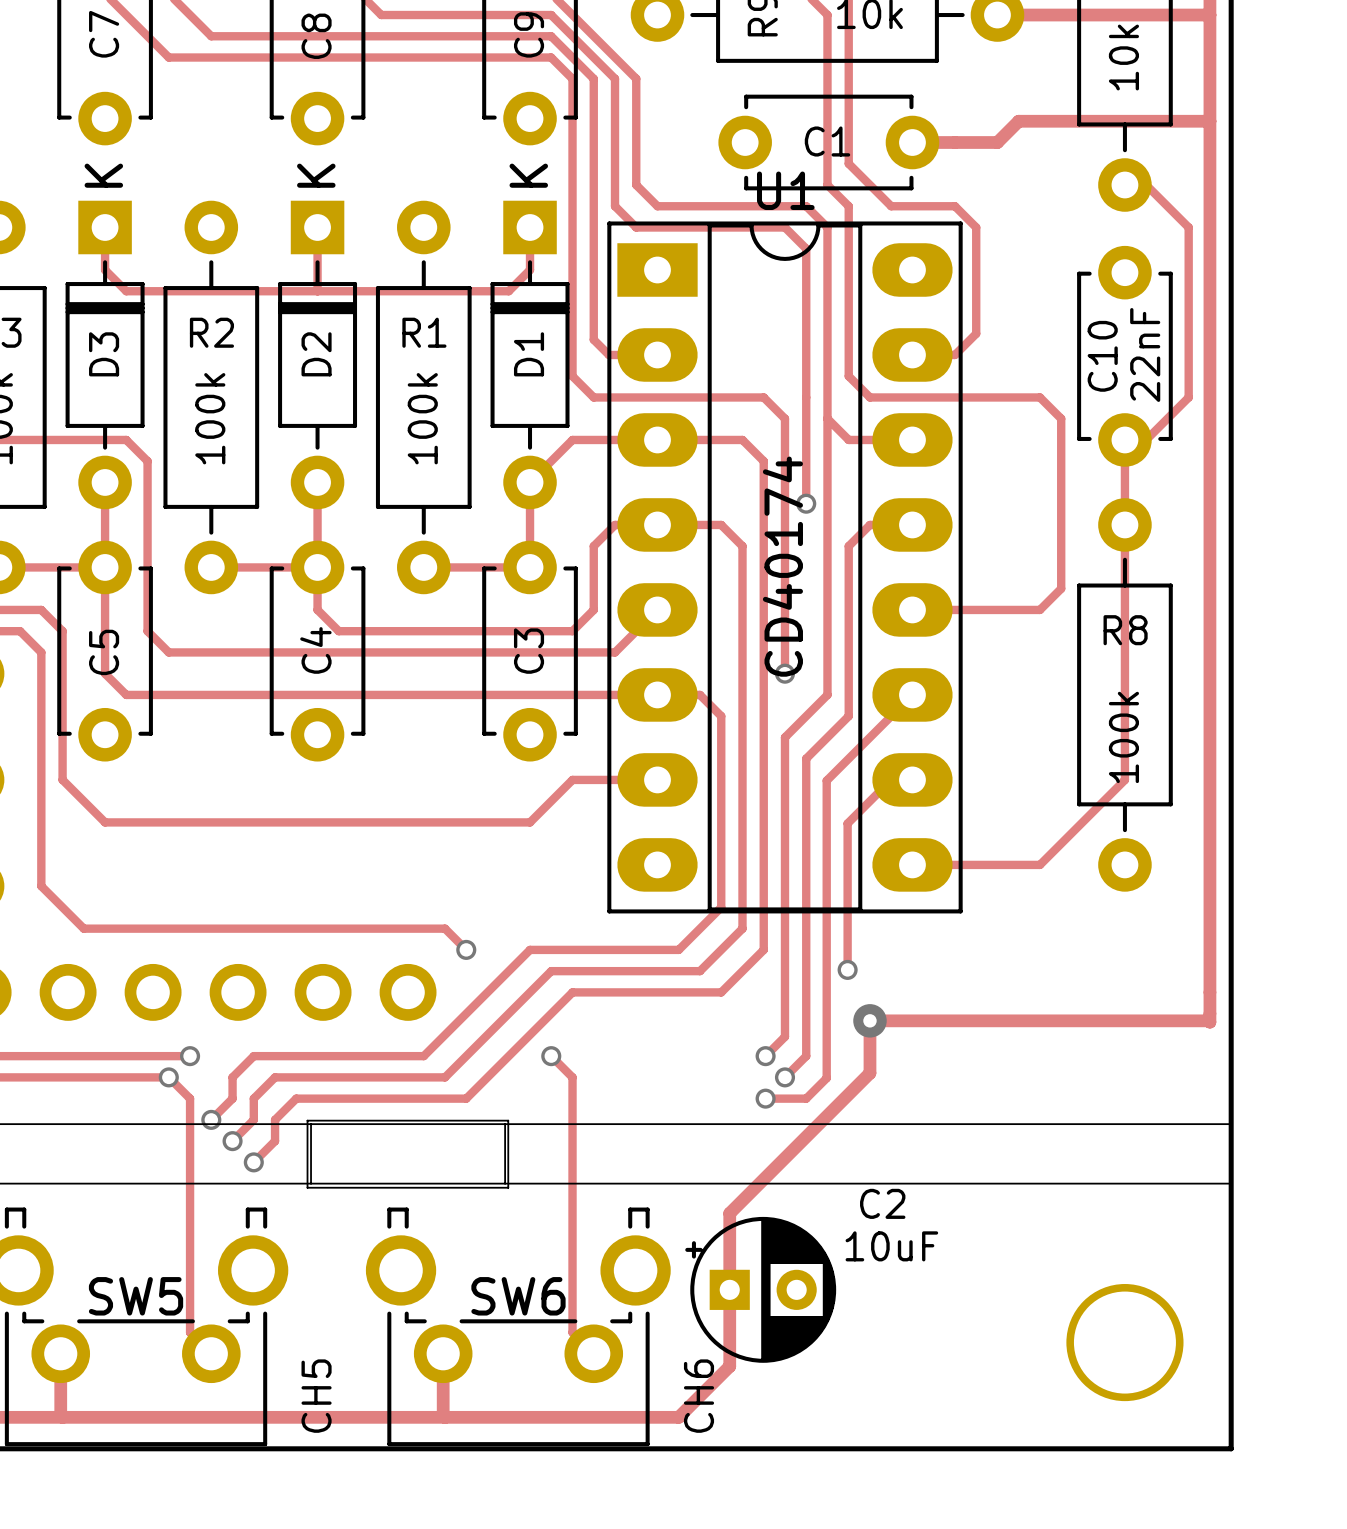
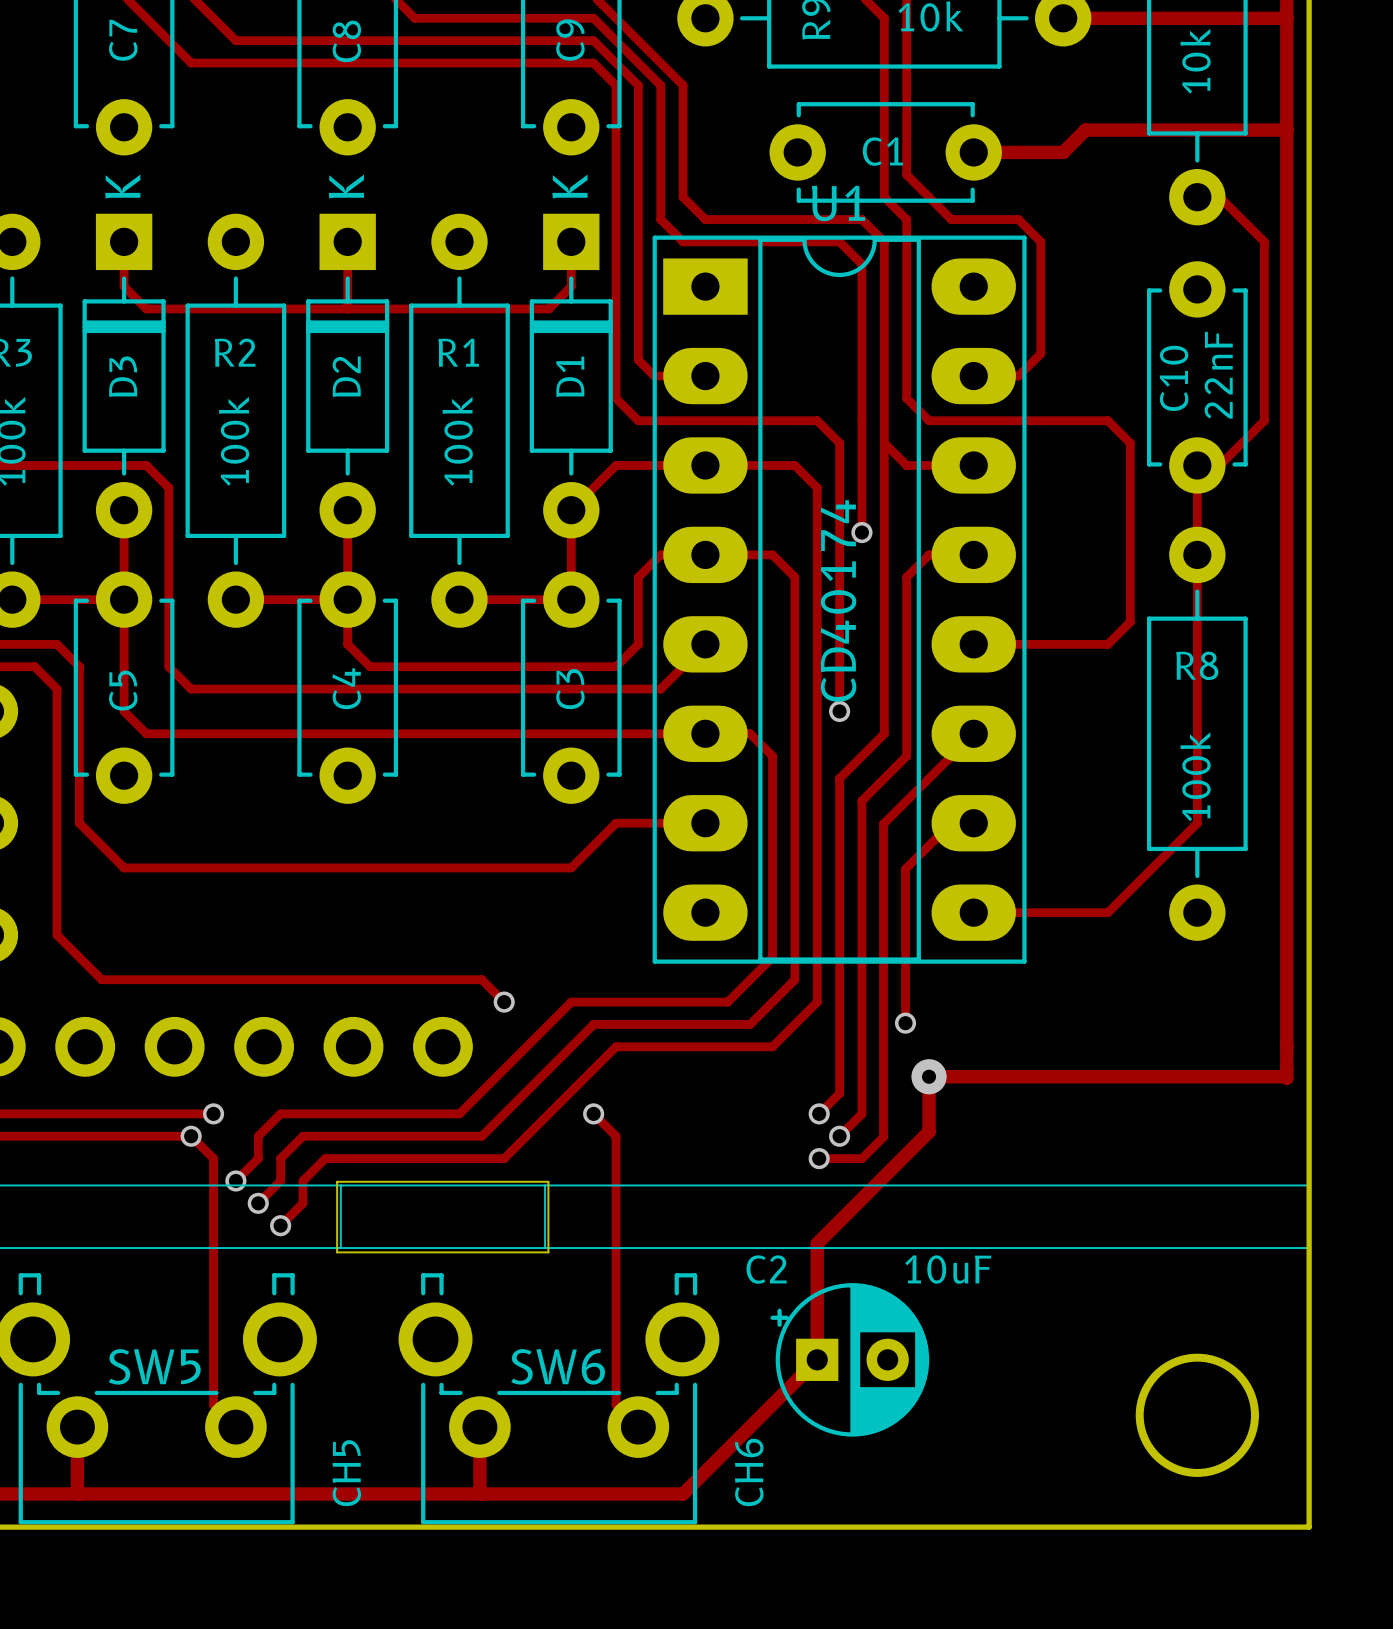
track: (763, 1179) (729, 1213) (729, 1366) (678, 1417) (636, 1417) -> (817, 1243) (817, 1359) (683, 1494)
C2 name position: C2 (882, 1203) -> C2 (766, 1269)
C2 value position: 10uF (891, 1246) -> 10uF (948, 1269)
C2 position: (760, 1289) -> (849, 1359)

